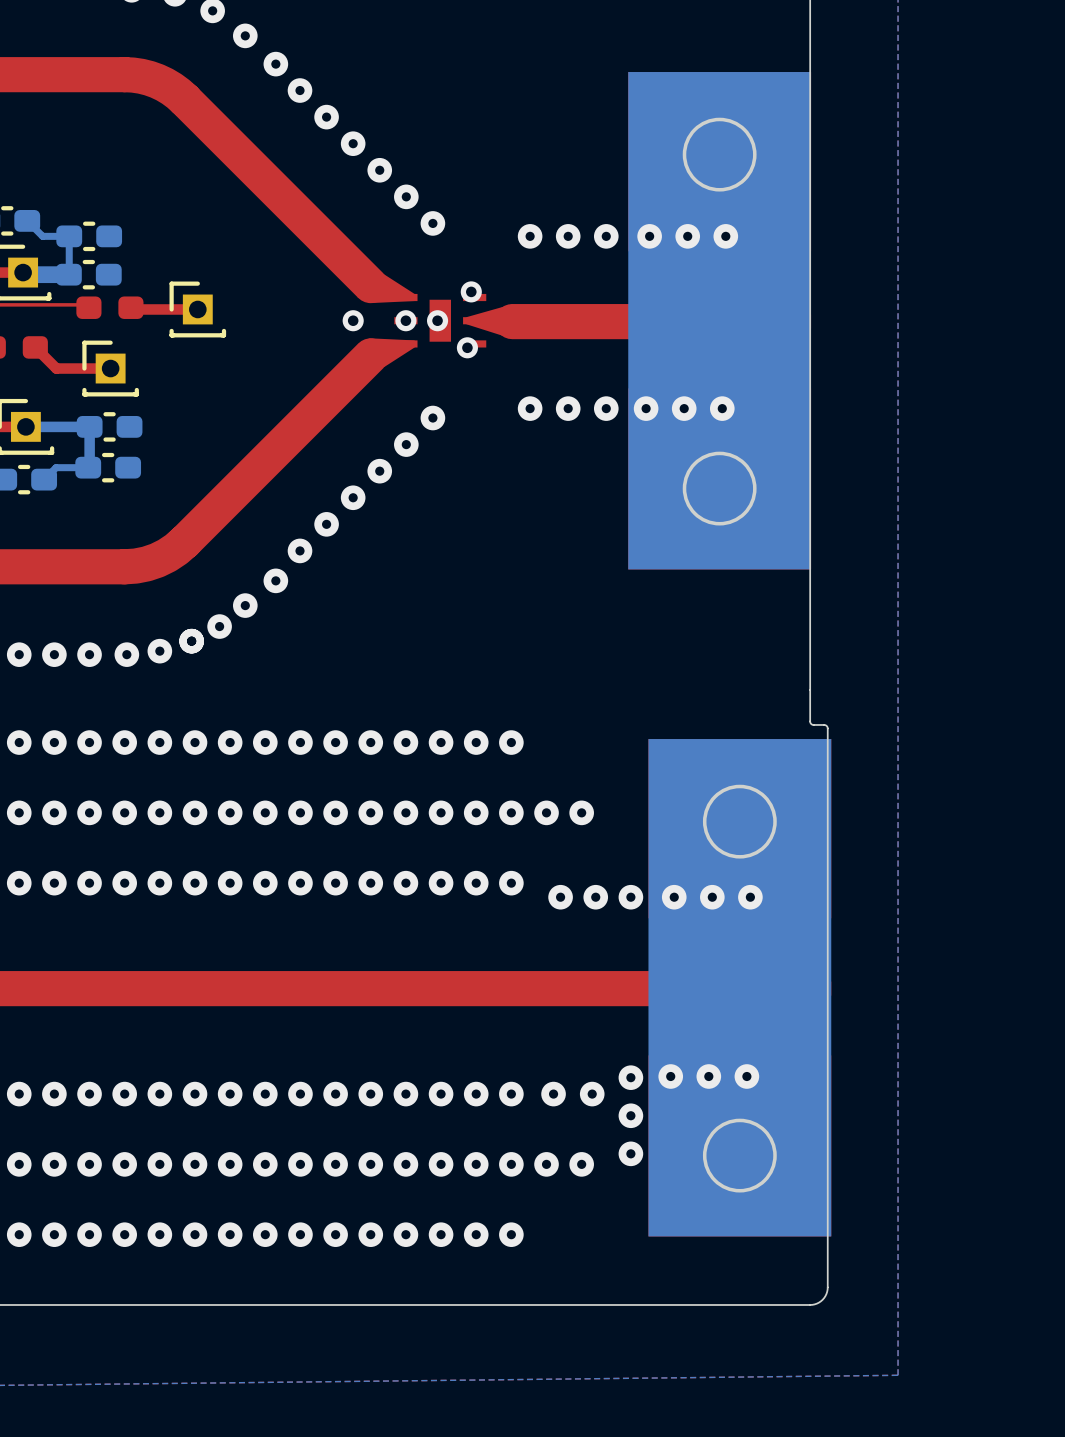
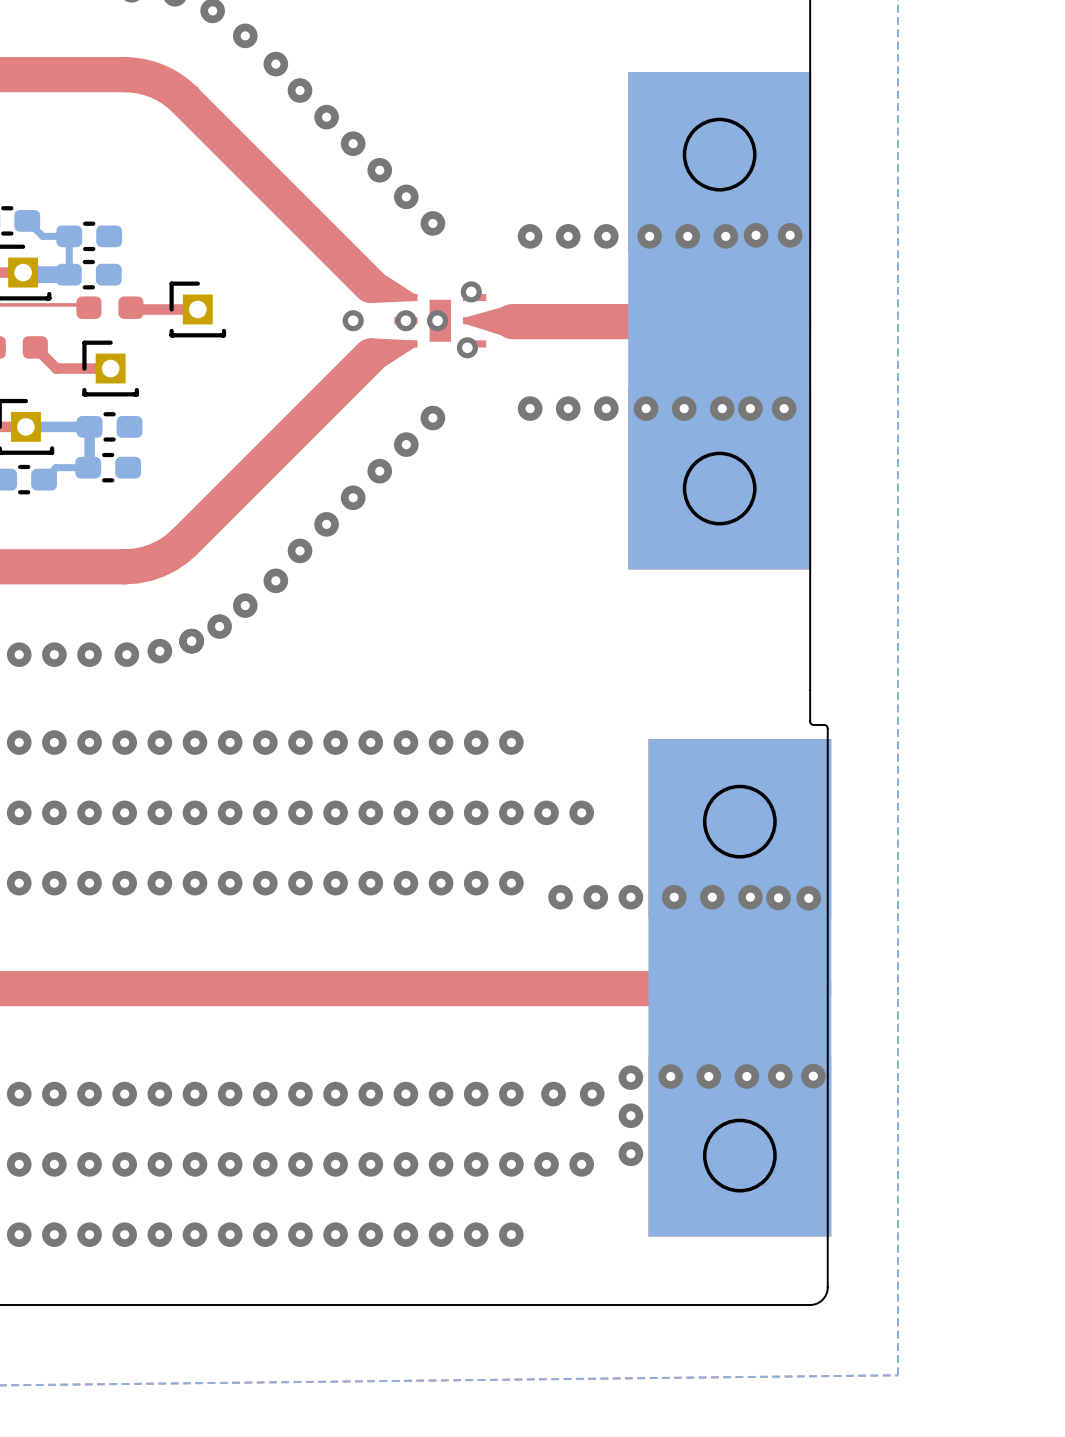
via: none -> (756, 235)
via: none -> (790, 235)
via: none -> (750, 408)
via: none -> (784, 408)
via: none -> (778, 897)
via: none -> (808, 898)
via: none -> (780, 1076)
via: none -> (813, 1076)

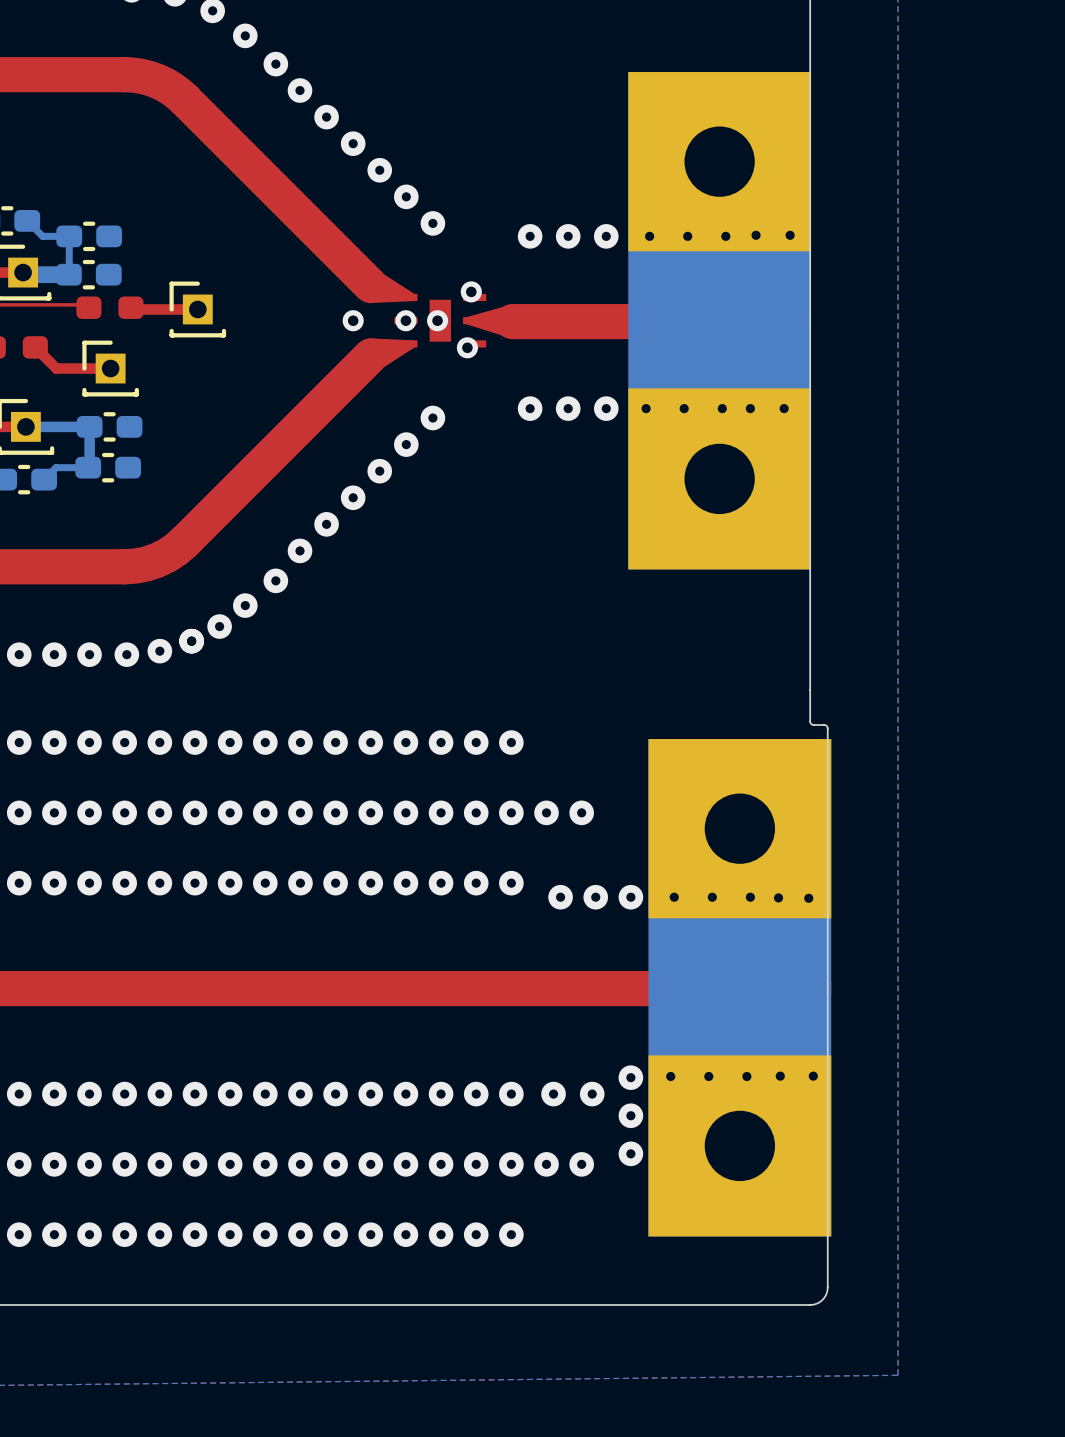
part footprint: [628, 72, 812, 570] -> [628, 72, 812, 570]
part footprint: [648, 739, 832, 1237] -> [648, 739, 832, 1237]

